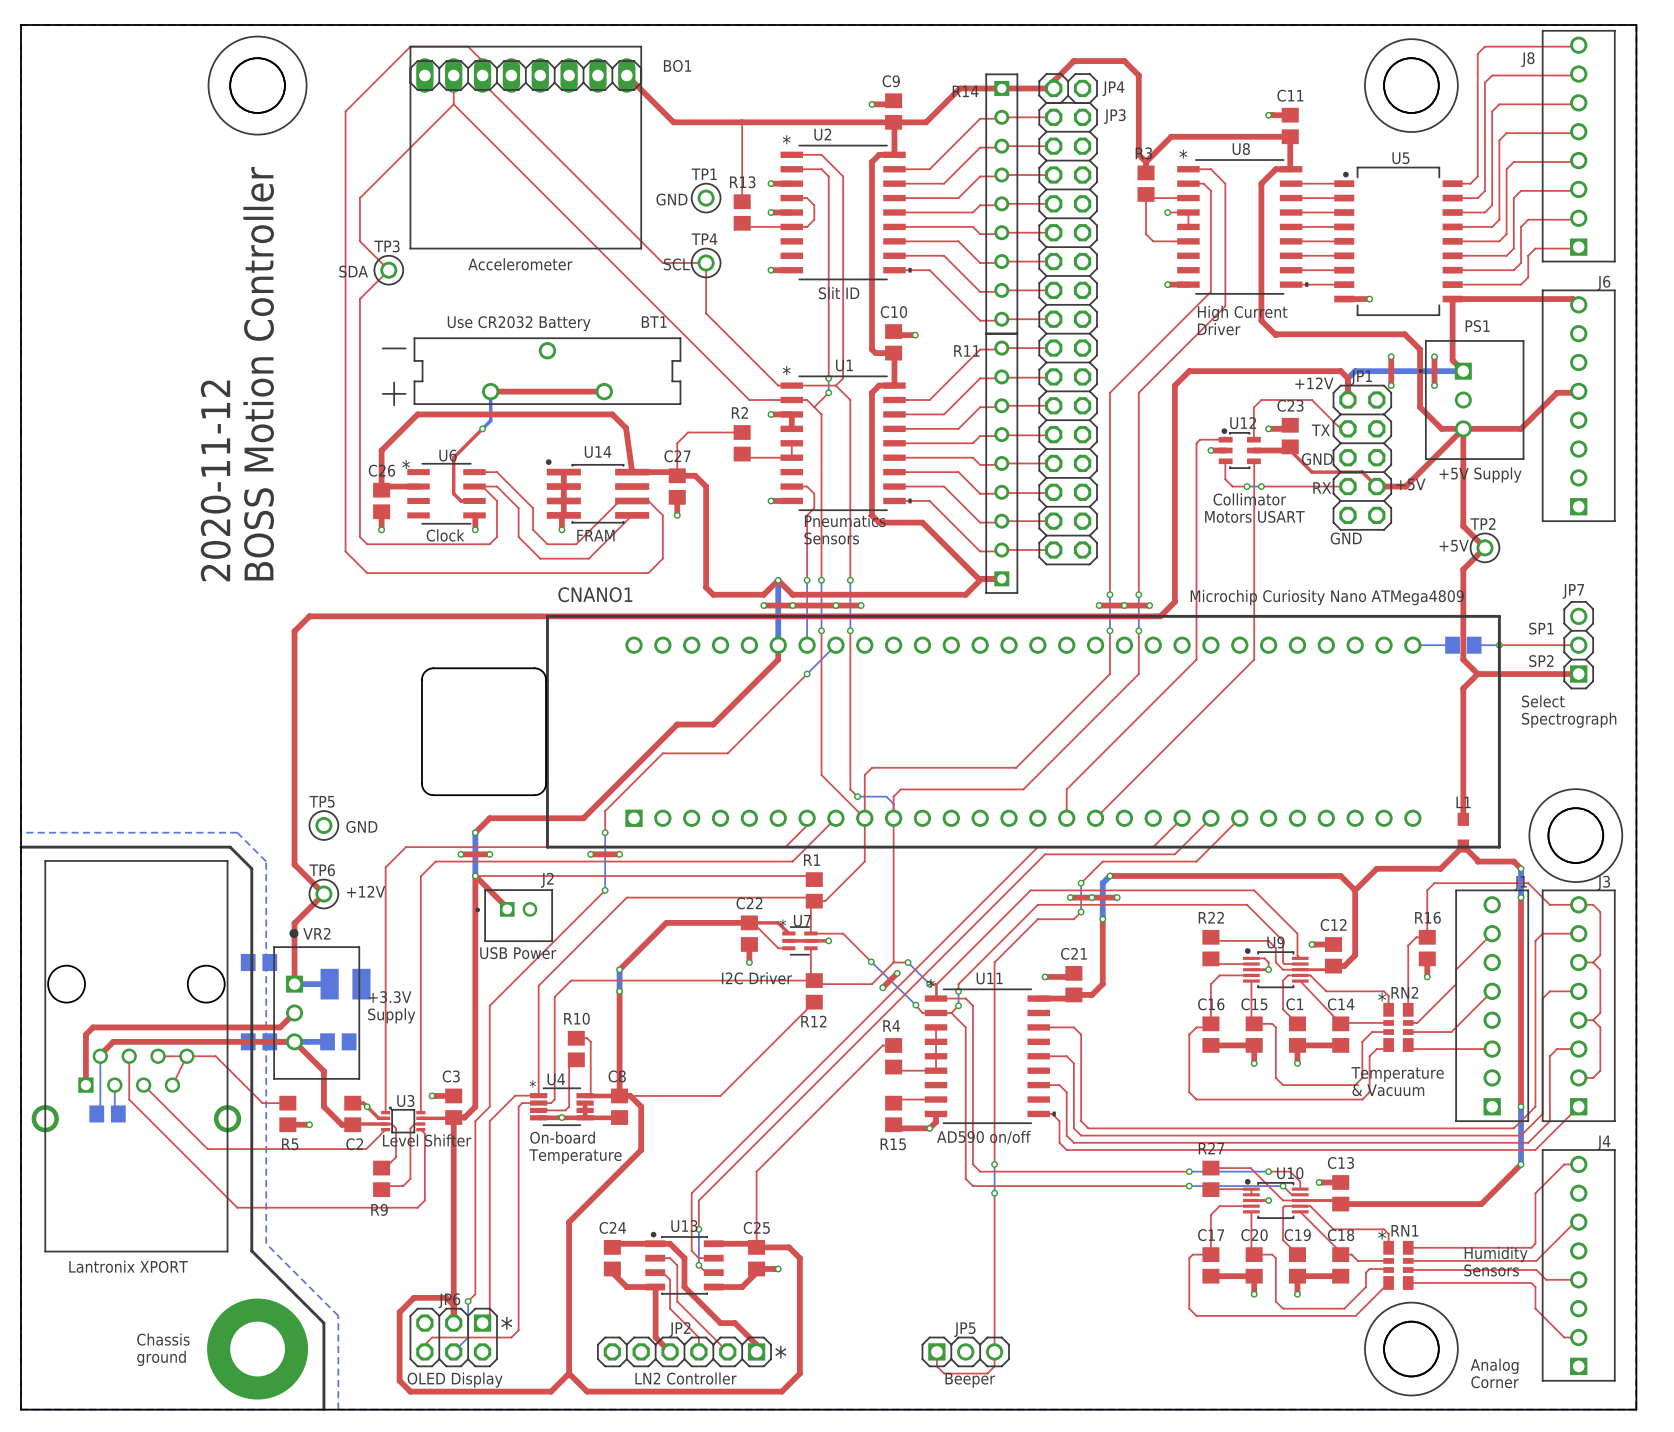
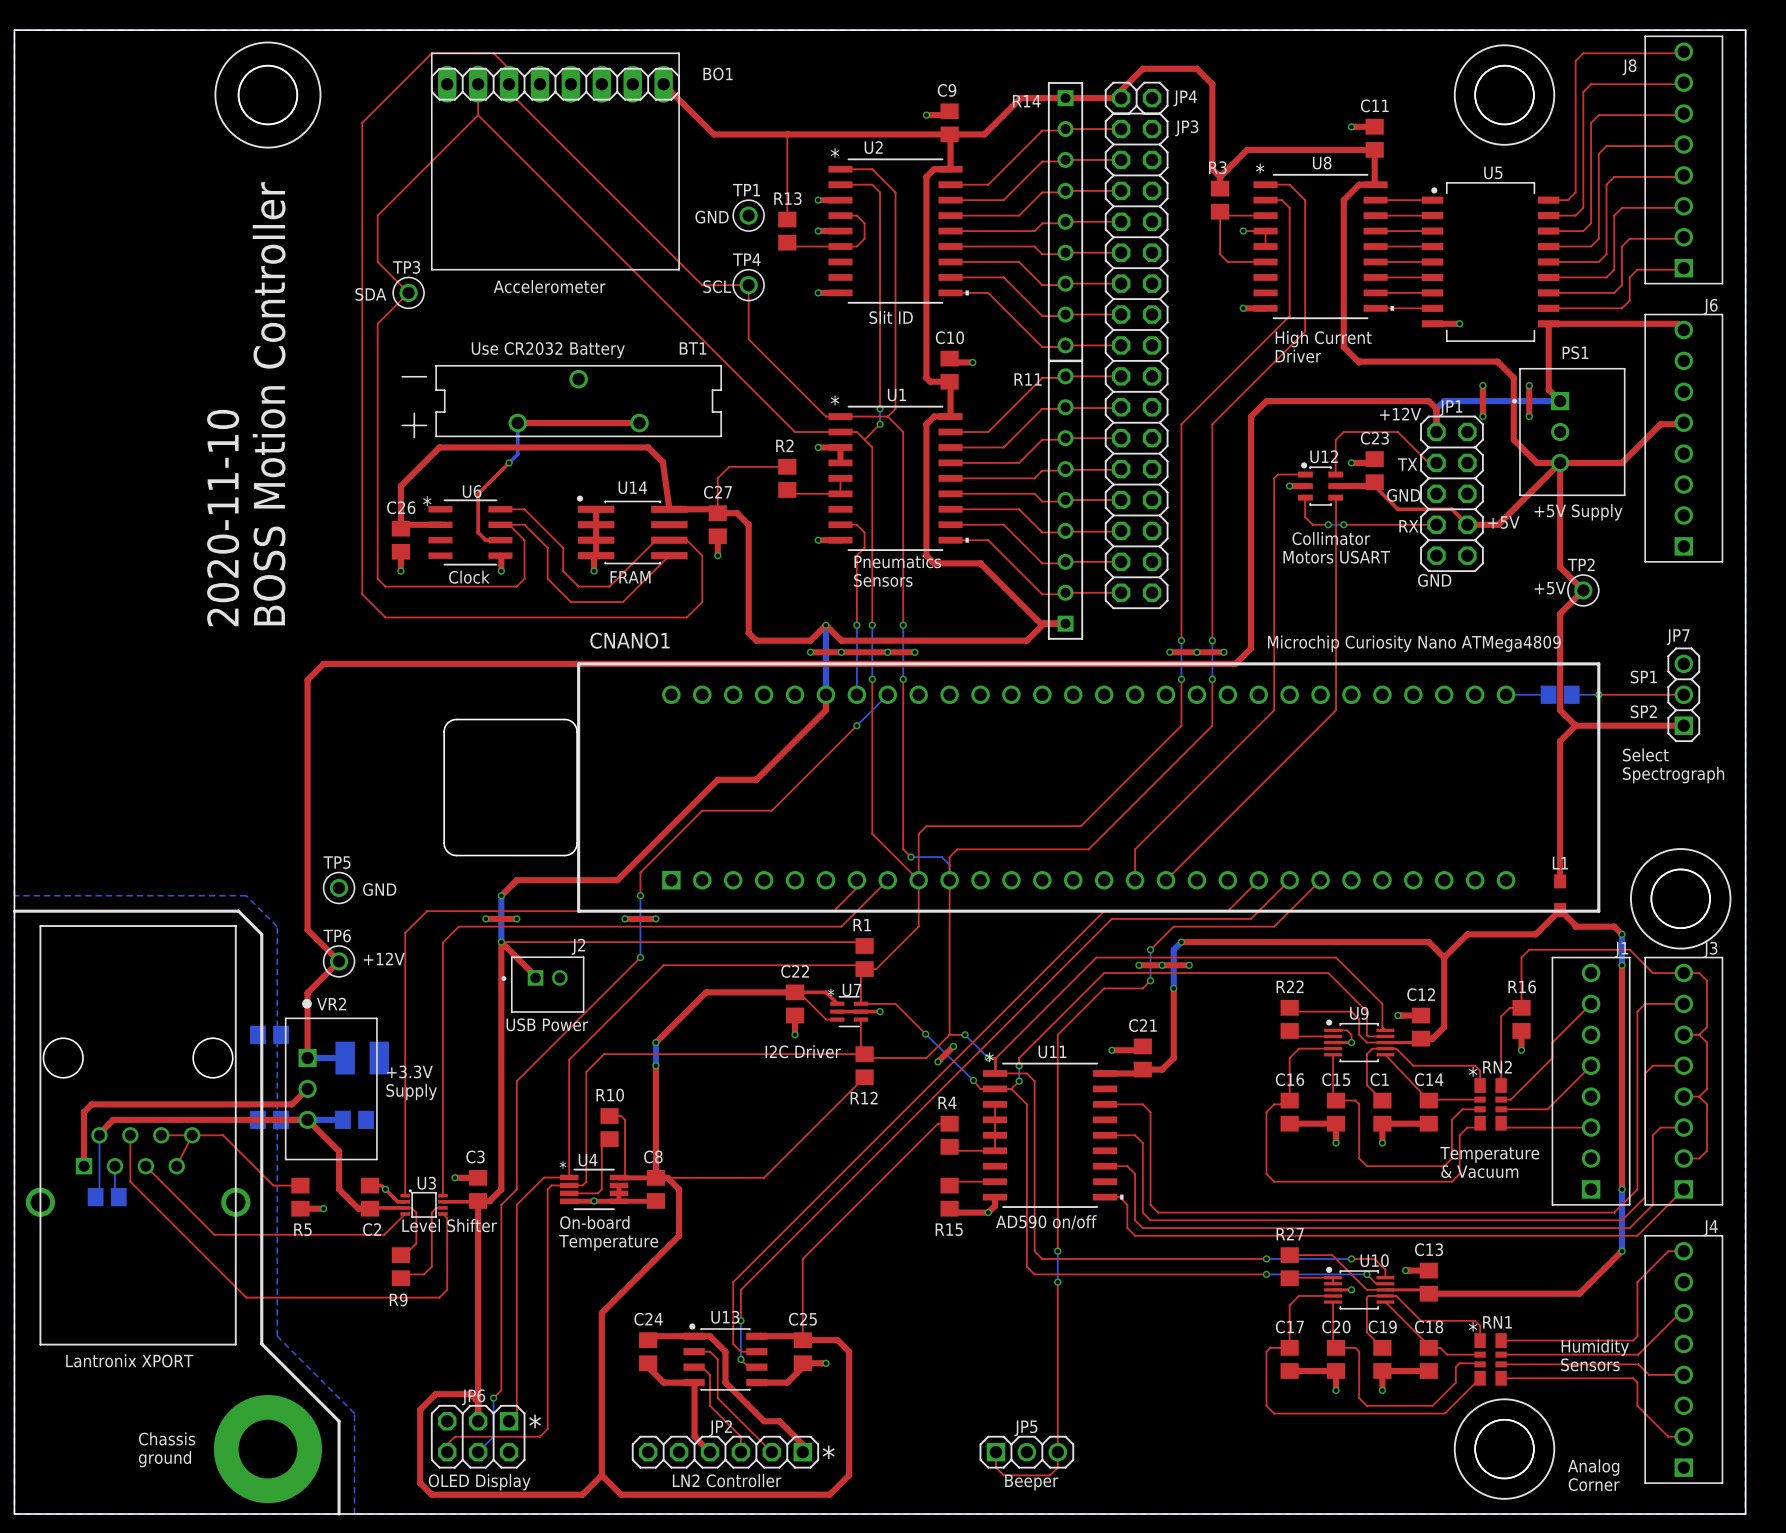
text: 2020-11-12 (215, 480) -> 2020-11-10 (223, 518)

